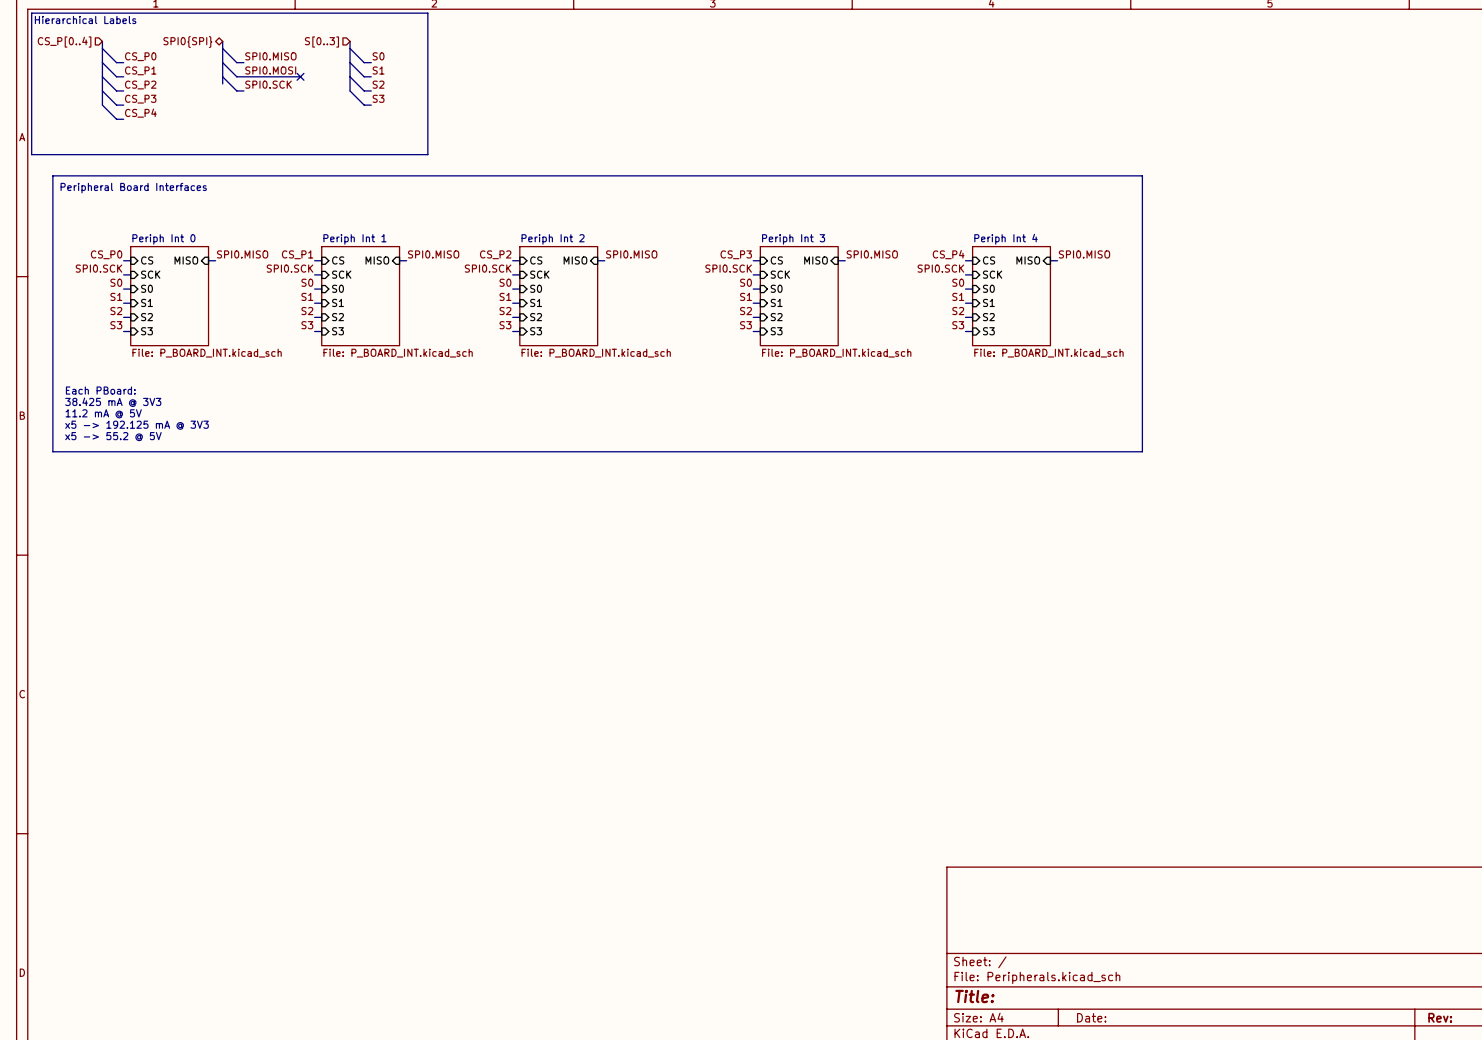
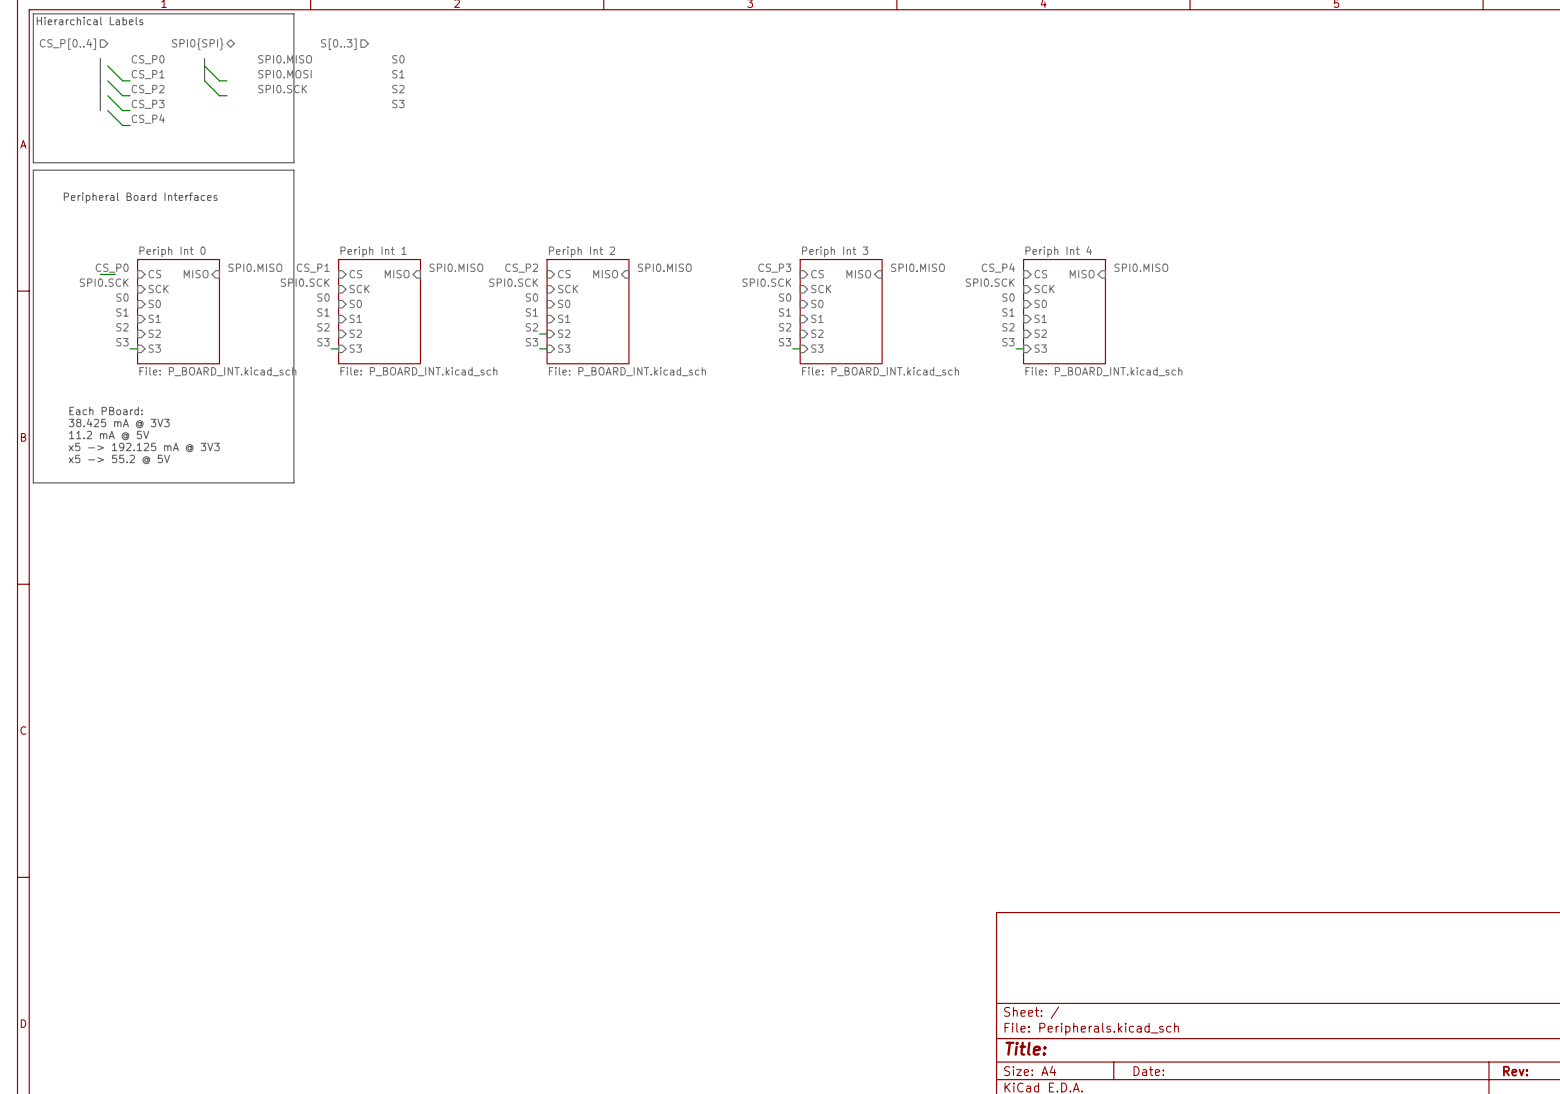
line: (279, 13) (427, 13) (427, 154) (279, 154) -> (293, 13) (293, 162)
bus: (102, 41) (102, 105) -> none
bus: (222, 41) (222, 83) -> none
bus: (350, 41) (350, 90) -> none
wire: (102, 48) (116, 62) (123, 62) -> none
wire: (222, 48) (236, 62) (243, 62) -> (204, 65) (219, 80) (226, 80)
wire: (350, 48) (364, 62) (371, 62) -> none
bus: none -> (100, 58) (100, 110)
bus: none -> (204, 58) (204, 80)
wire: (222, 62) (236, 76) (300, 76) -> none
wire: (350, 62) (364, 76) (371, 76) -> none
wire: (222, 76) (236, 90) (243, 90) -> (204, 80) (219, 95) (226, 95)
no-connect mark: (300, 76) -> none
wire: (350, 76) (364, 90) (371, 90) -> none
wire: (350, 90) (364, 105) (371, 105) -> none
line: none -> (33, 170) (293, 170) (293, 482) (33, 482) (33, 170)
line: (52, 175) (1142, 175) (1142, 451) (52, 451) (52, 175) -> none
wire: none -> (100, 274) (115, 274)
wire: (123, 260) (130, 260) -> none
wire: (208, 260) (215, 260) -> none
wire: (314, 260) (321, 260) -> none
wire: (399, 260) (406, 260) -> none
wire: (512, 260) (519, 260) -> none
wire: (597, 260) (604, 260) -> none
wire: (753, 260) (760, 260) -> none
wire: (838, 260) (845, 260) -> none
wire: (965, 260) (972, 260) -> none
wire: (1050, 260) (1057, 260) -> none
wire: (123, 274) (130, 274) -> none
wire: (314, 274) (321, 274) -> none
wire: (512, 274) (519, 274) -> none
wire: (753, 274) (760, 274) -> none
wire: (965, 274) (972, 274) -> none
wire: (123, 289) (130, 289) -> none
wire: (314, 289) (321, 289) -> none
wire: (512, 289) (519, 289) -> none
wire: (753, 289) (760, 289) -> none
wire: (965, 289) (972, 289) -> none
wire: (123, 303) (130, 303) -> none
wire: (314, 303) (321, 303) -> none
wire: (512, 303) (519, 303) -> none
wire: (753, 303) (760, 303) -> none
wire: (965, 303) (972, 303) -> none
wire: (123, 317) (130, 317) -> none
wire: (314, 317) (321, 317) -> none
wire: (753, 317) (760, 317) -> none
wire: (965, 317) (972, 317) -> none

